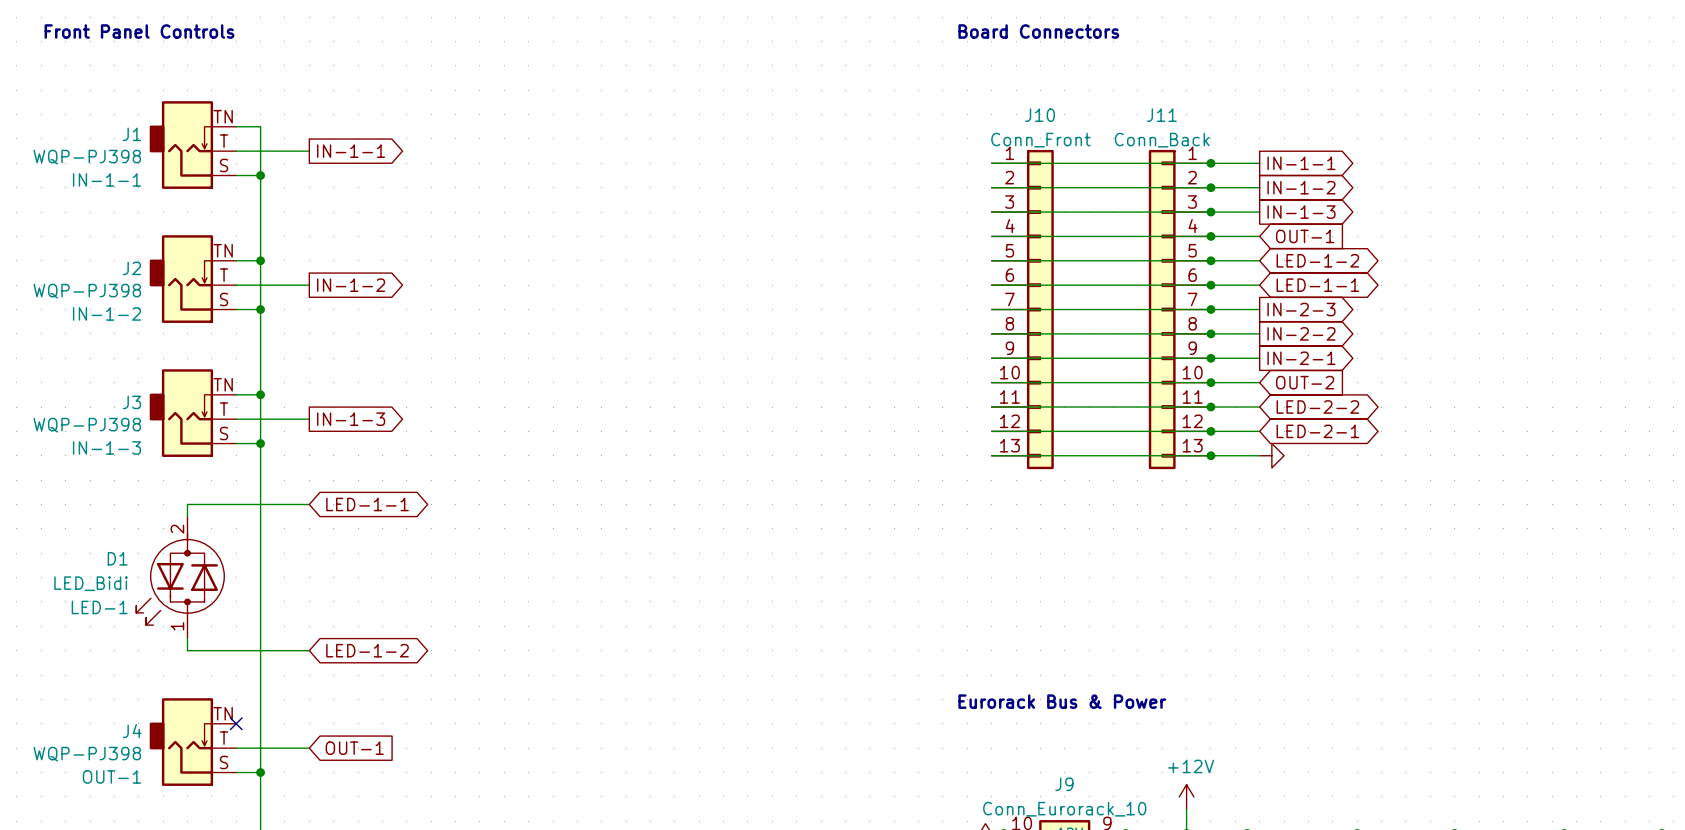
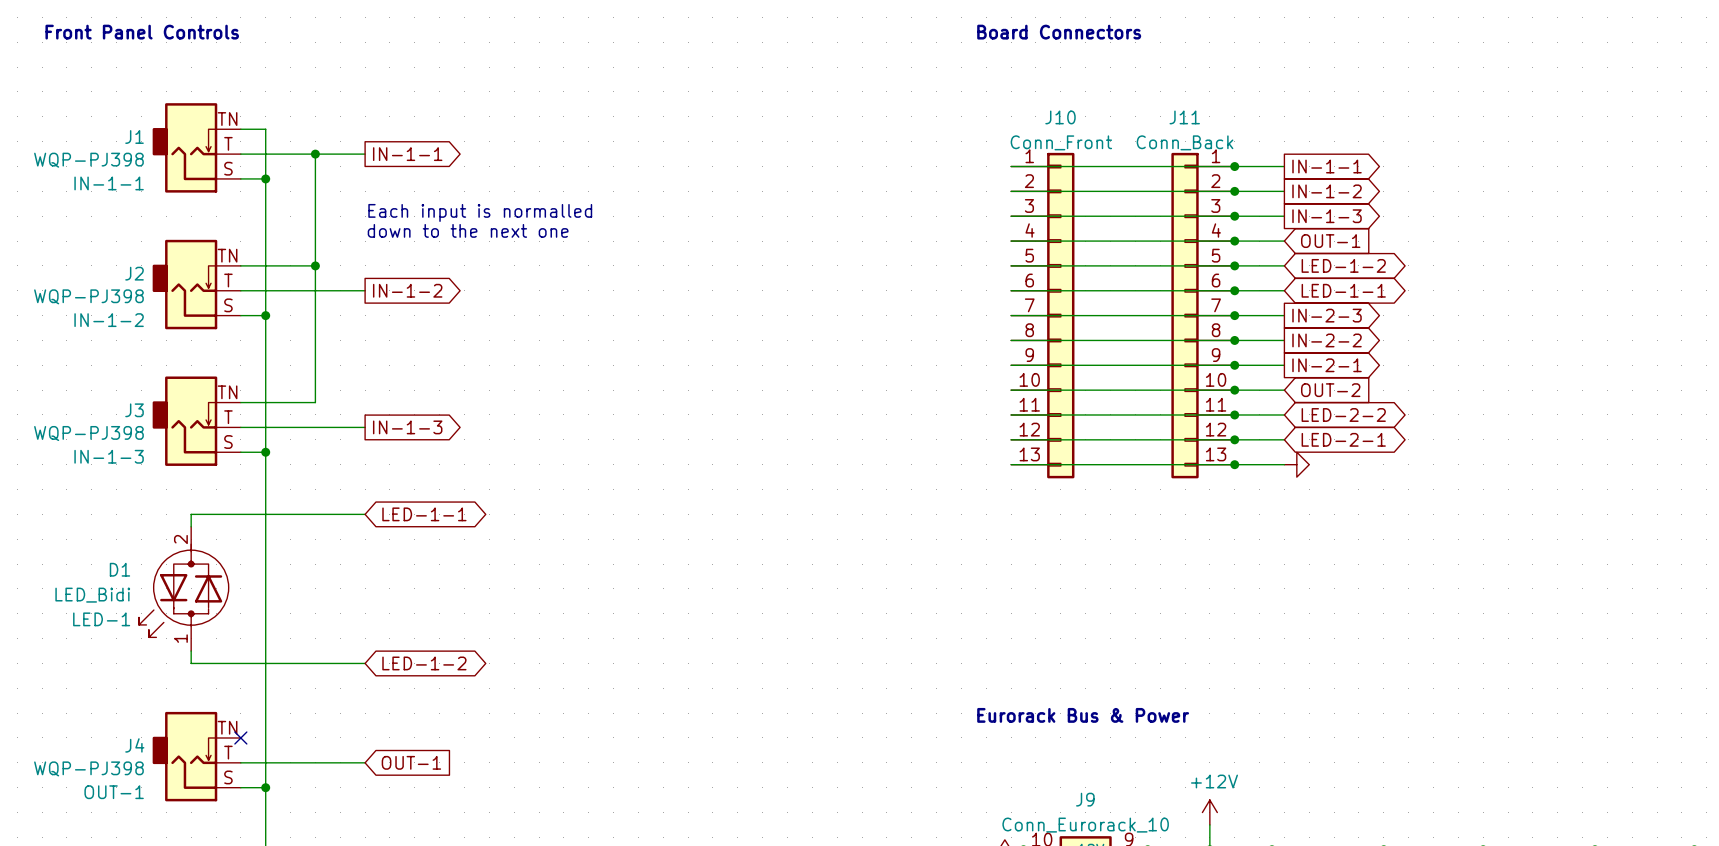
junction: none -> (315, 154)
global label position: IN-1-1 (351, 151) -> IN-1-1 (407, 154)
wire: none -> (365, 154) (315, 154) (315, 402) (265, 402)
text: none -> Each input is normalled (480, 212)
text: none -> down to the next one (468, 230)
wire: none -> (265, 265) (315, 265)
junction position: (260, 260) -> (315, 265)
wire: none -> (315, 290) (365, 290)
global label position: IN-1-2 (351, 285) -> IN-1-2 (407, 290)
junction: (260, 394) -> none
wire: none -> (315, 427) (365, 427)
global label position: IN-1-3 (351, 419) -> IN-1-3 (407, 427)
wire: none -> (315, 514) (365, 514)
global label position: LED-1-1 (367, 504) -> LED-1-1 (424, 514)
wire: none -> (315, 663) (365, 663)
global label position: LED-1-2 (367, 650) -> LED-1-2 (424, 663)
wire: none -> (315, 762) (365, 762)
global label position: OUT-1 (354, 748) -> OUT-1 (411, 762)

